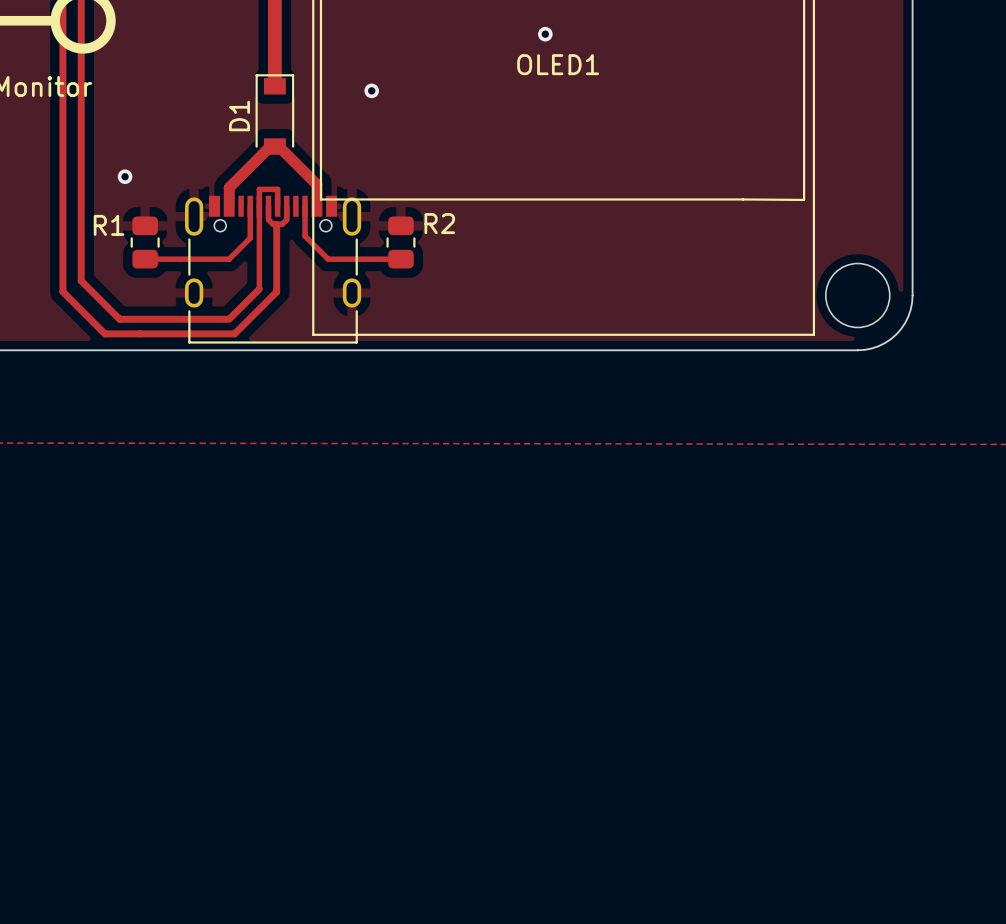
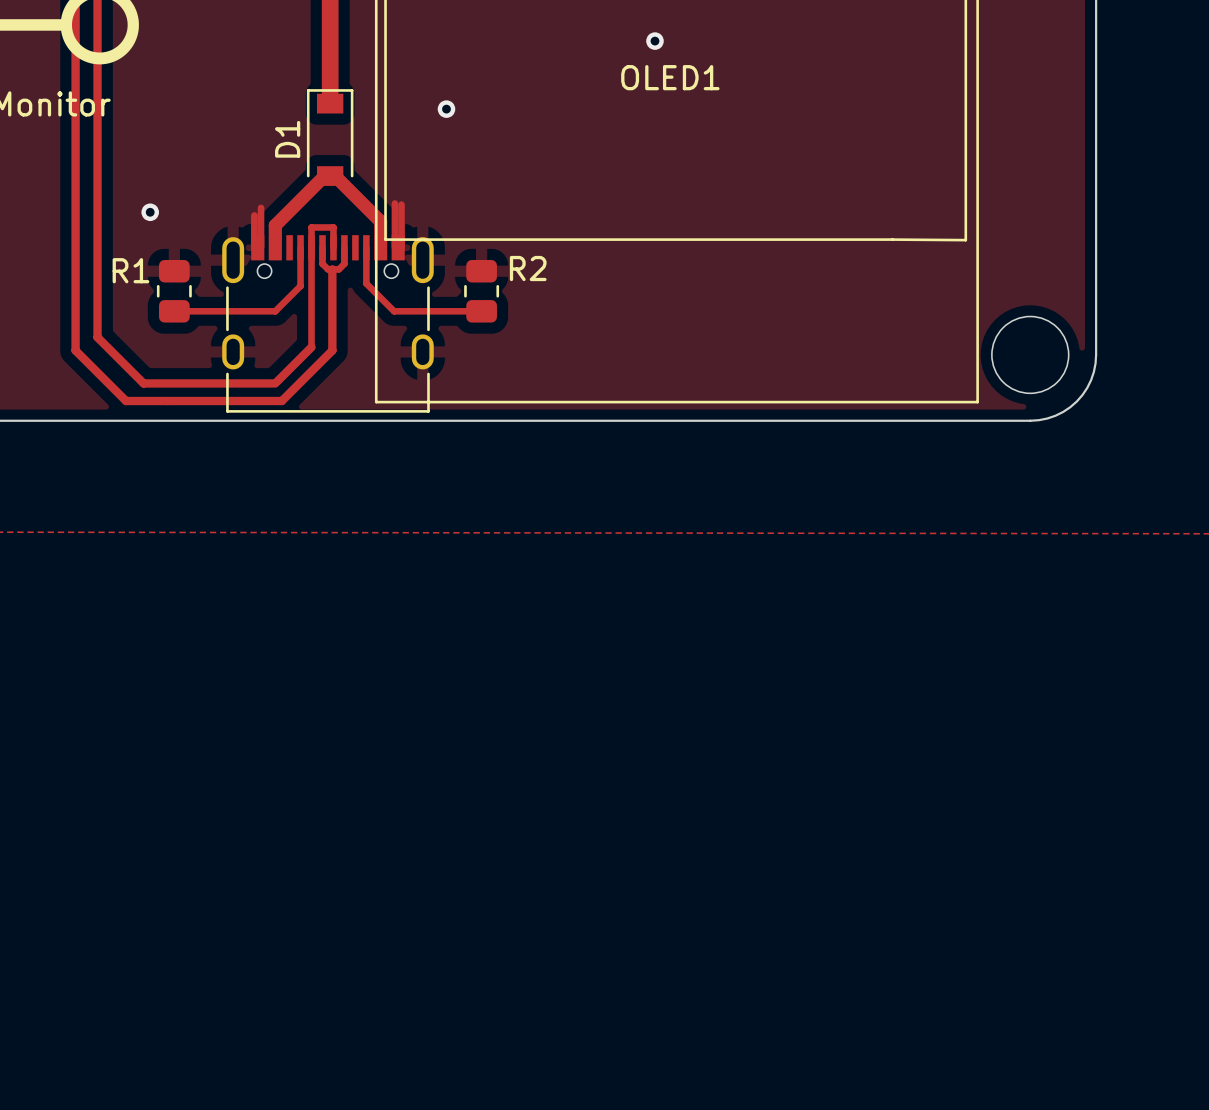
track: none -> (394, 203) (394, 247)
track: none -> (401, 204) (401, 247)
track: none -> (261, 207) (261, 247)
track: none -> (254, 215) (254, 247)

